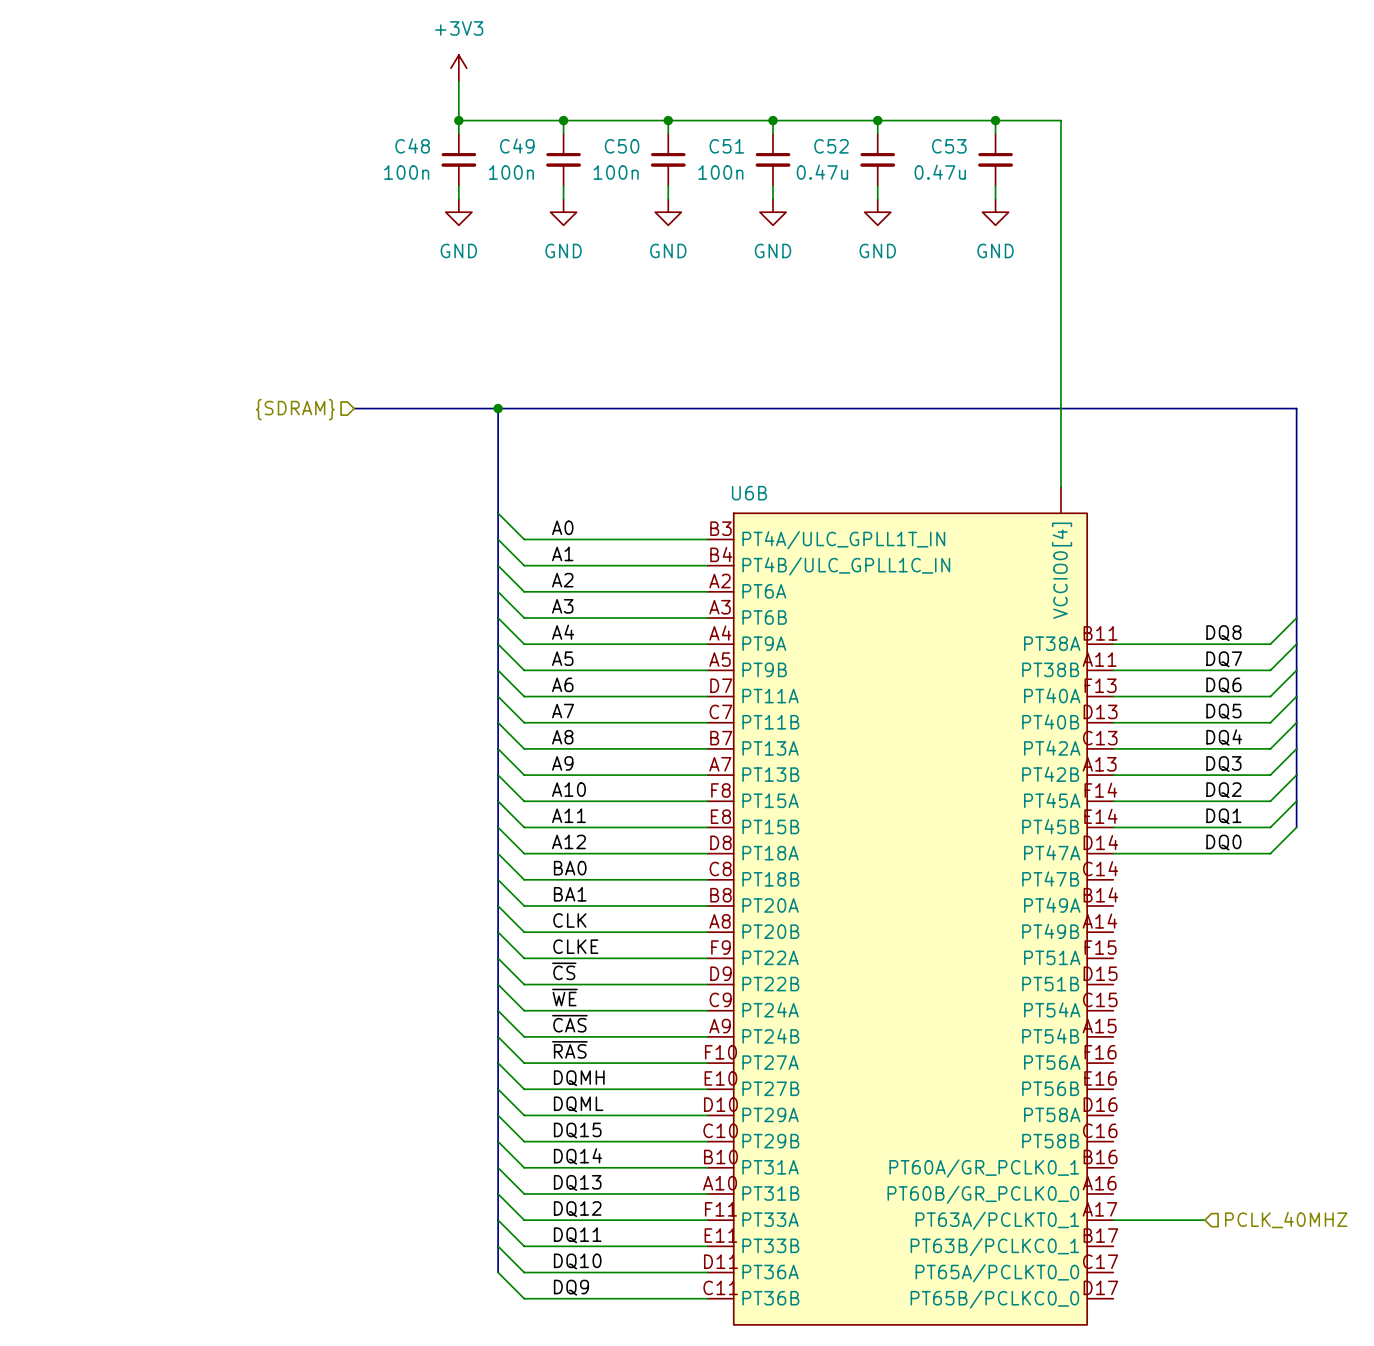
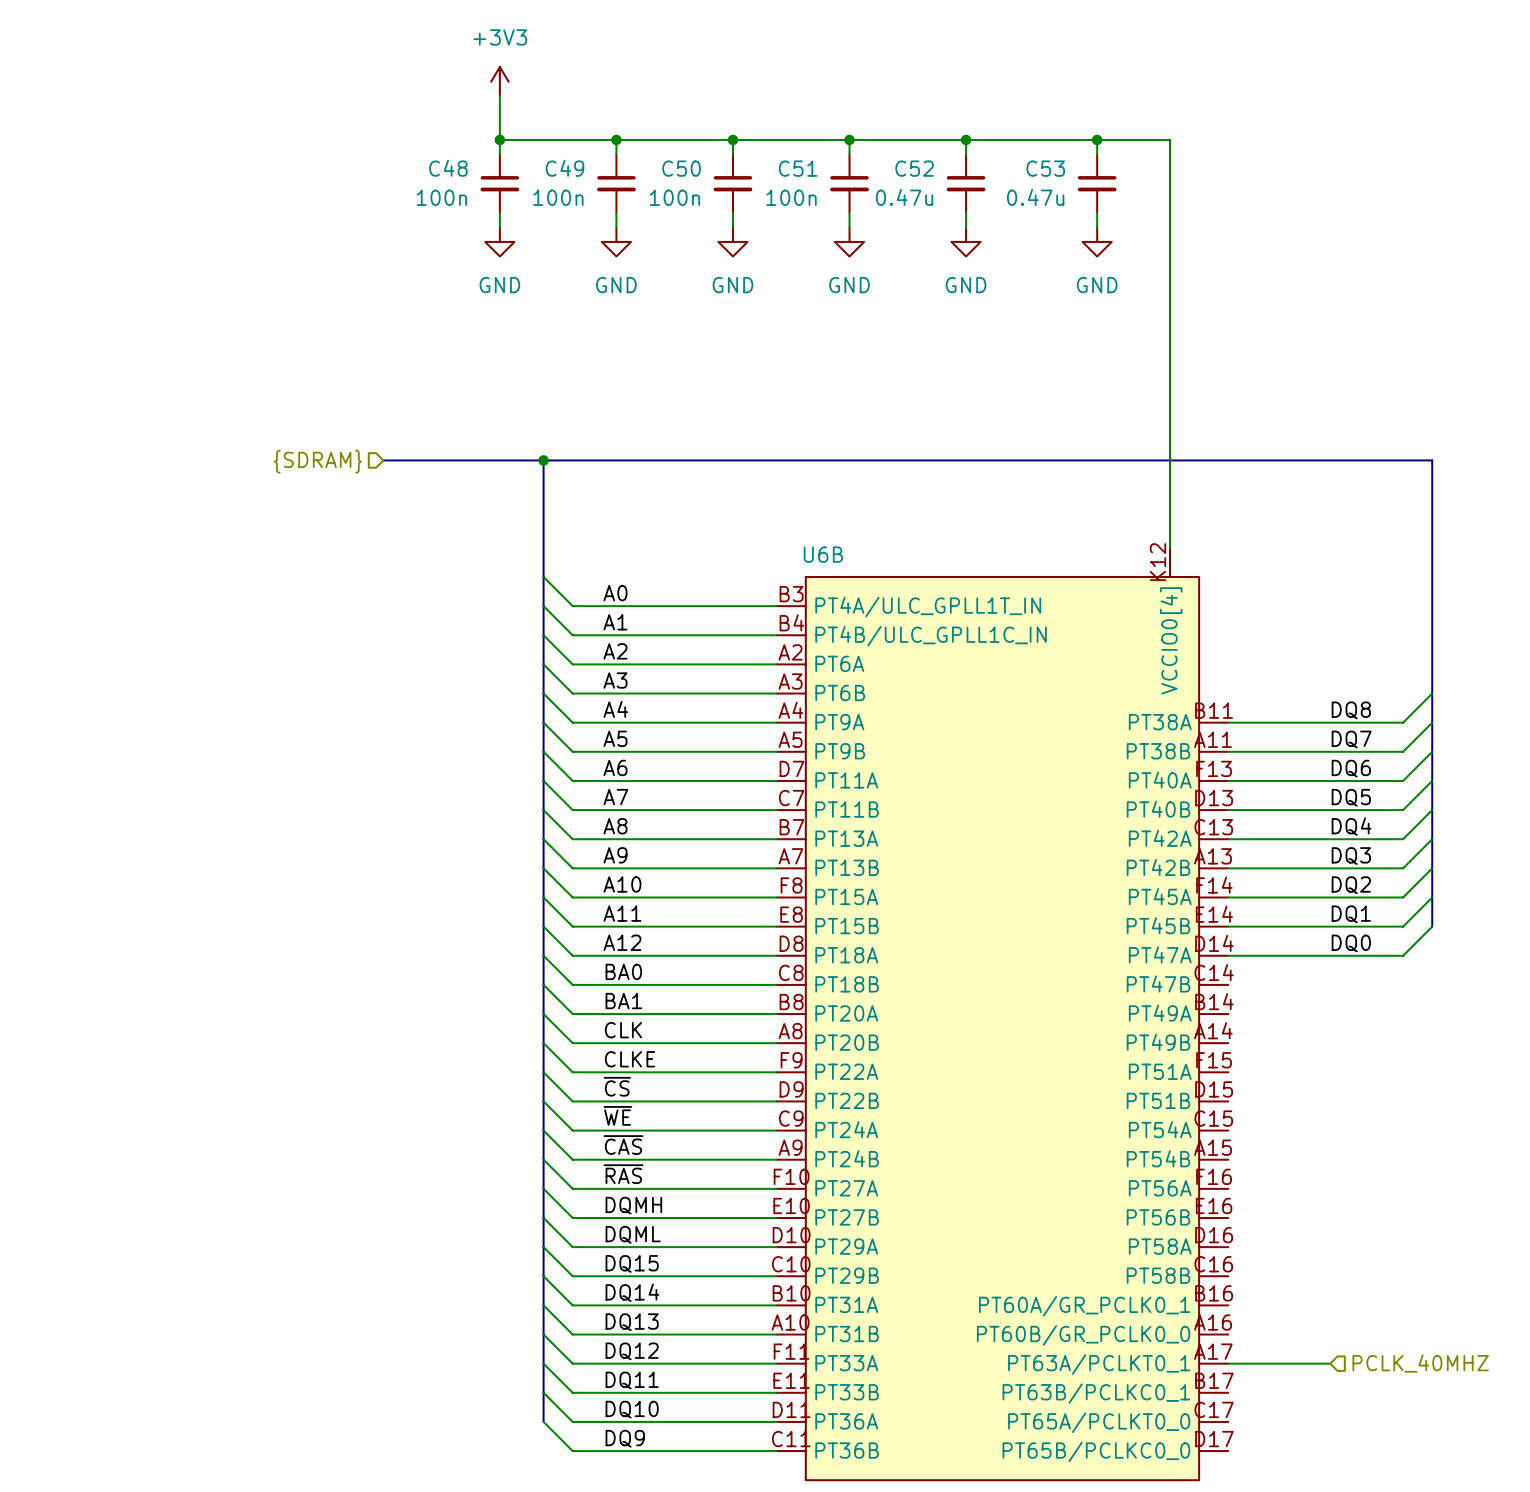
U6B pin number: none -> K12 (1157, 562)

